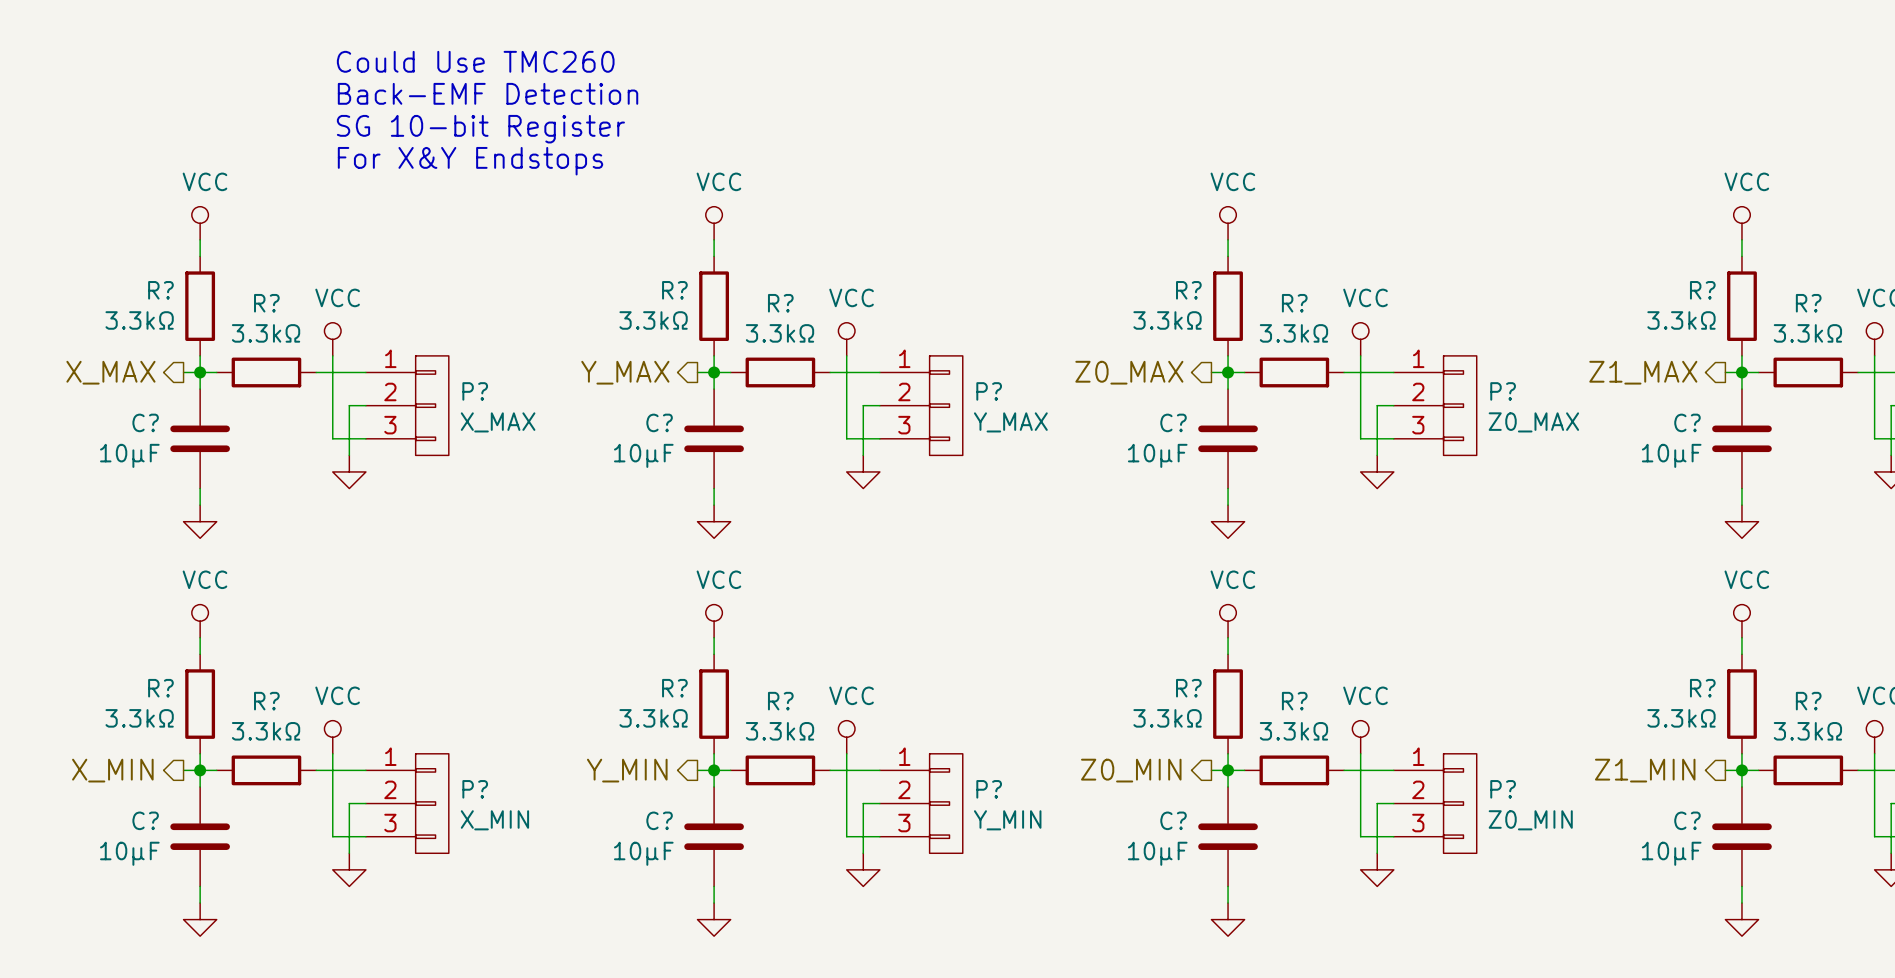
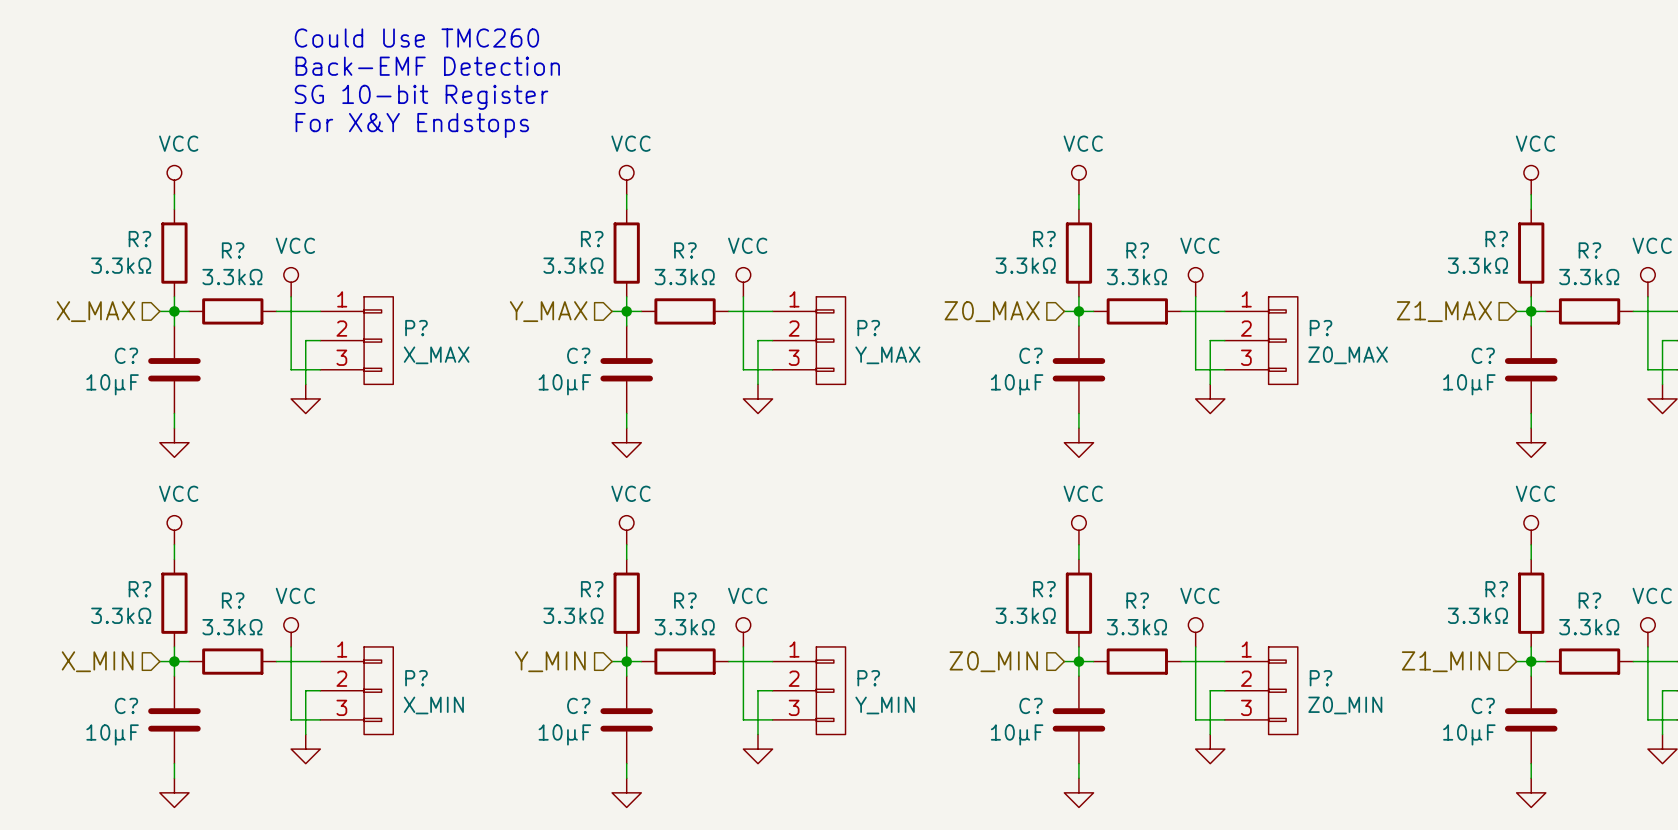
hierarchical label shape: output (110, 372) -> input (95, 311)
hierarchical label shape: output (625, 372) -> input (548, 311)
hierarchical label shape: output (1129, 372) -> input (992, 311)
hierarchical label shape: output (1643, 372) -> input (1444, 311)
hierarchical label shape: output (112, 770) -> input (97, 661)
hierarchical label shape: output (627, 770) -> input (550, 661)
hierarchical label shape: output (1131, 770) -> input (993, 661)
hierarchical label shape: output (1645, 770) -> input (1446, 661)

